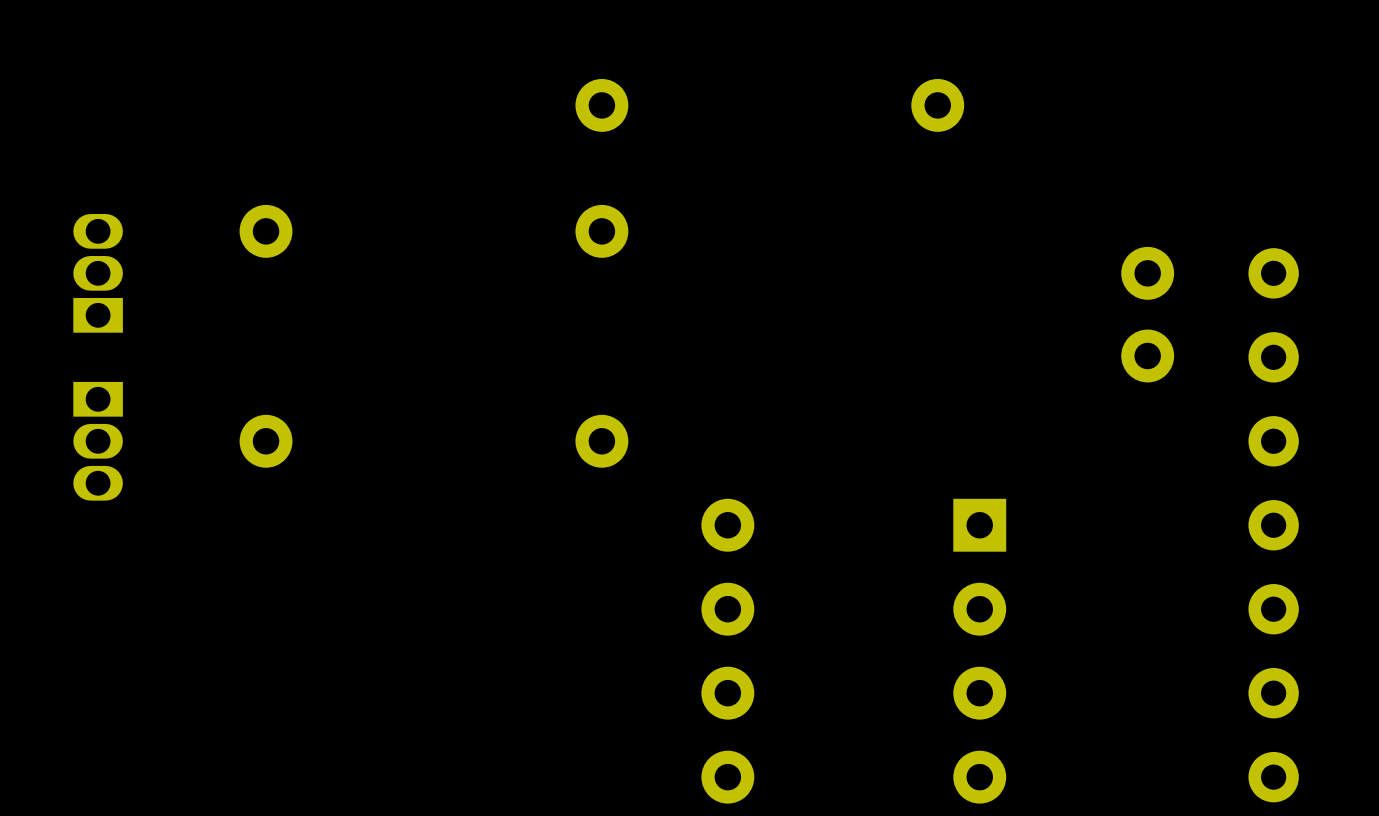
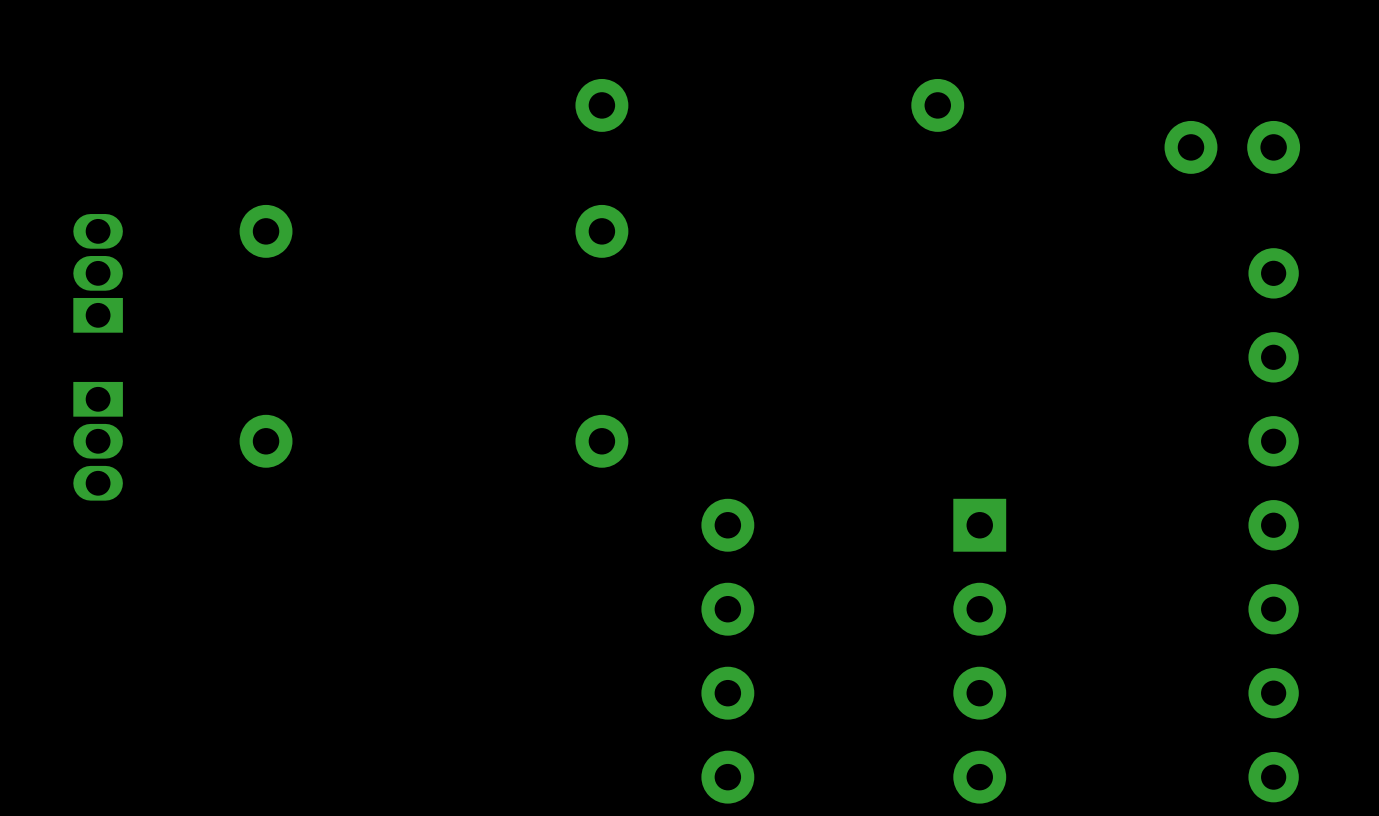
part rotation: 0° (1147, 314) -> 90° clockwise (1232, 147)
part position: (1147, 314) -> (1232, 147)

